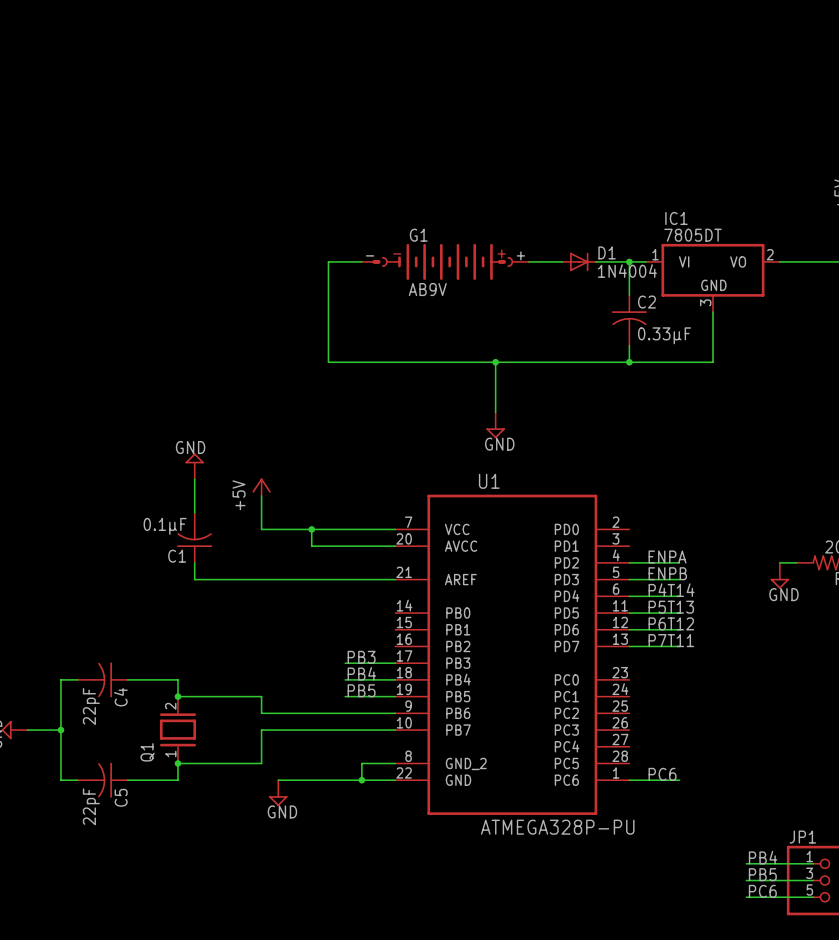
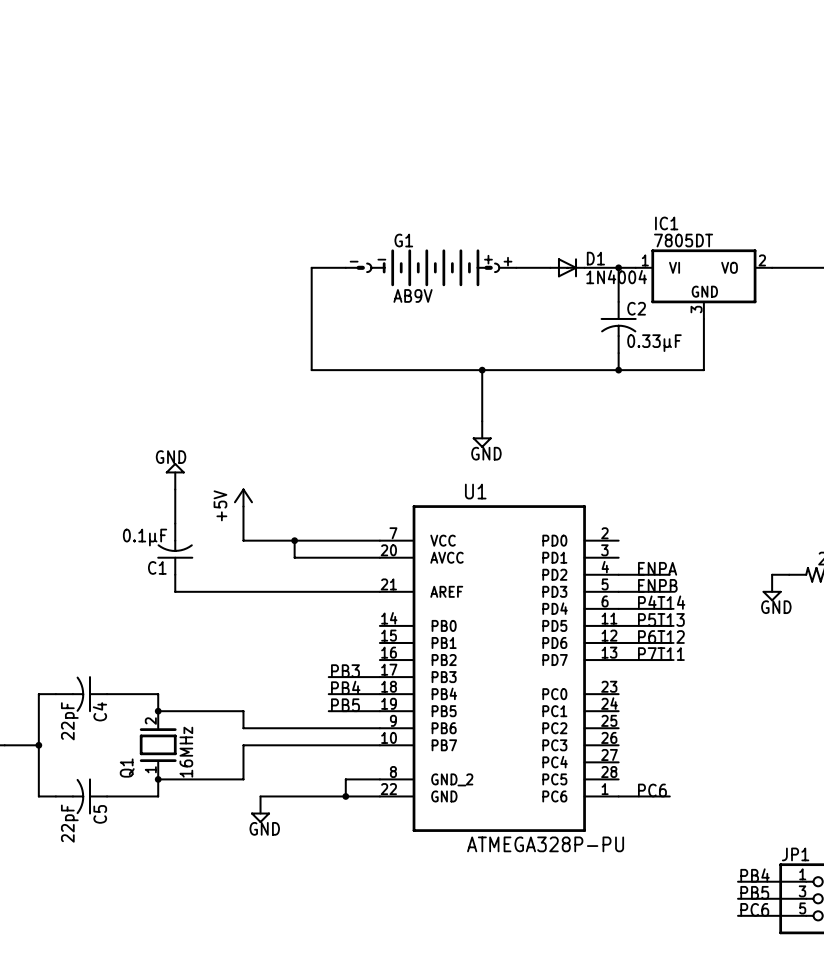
Q1 value: none -> 16MHz (186, 752)

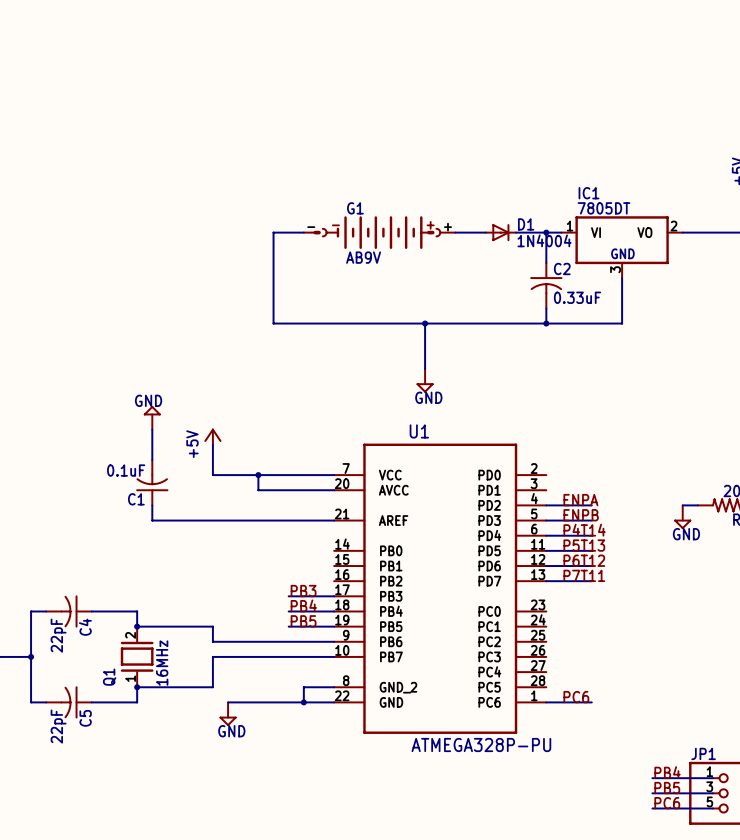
C2 value: 0.33µF (654, 343) -> 0.33uF (577, 297)
C1 value: 0.1µF (145, 537) -> 0.1uF (126, 470)

